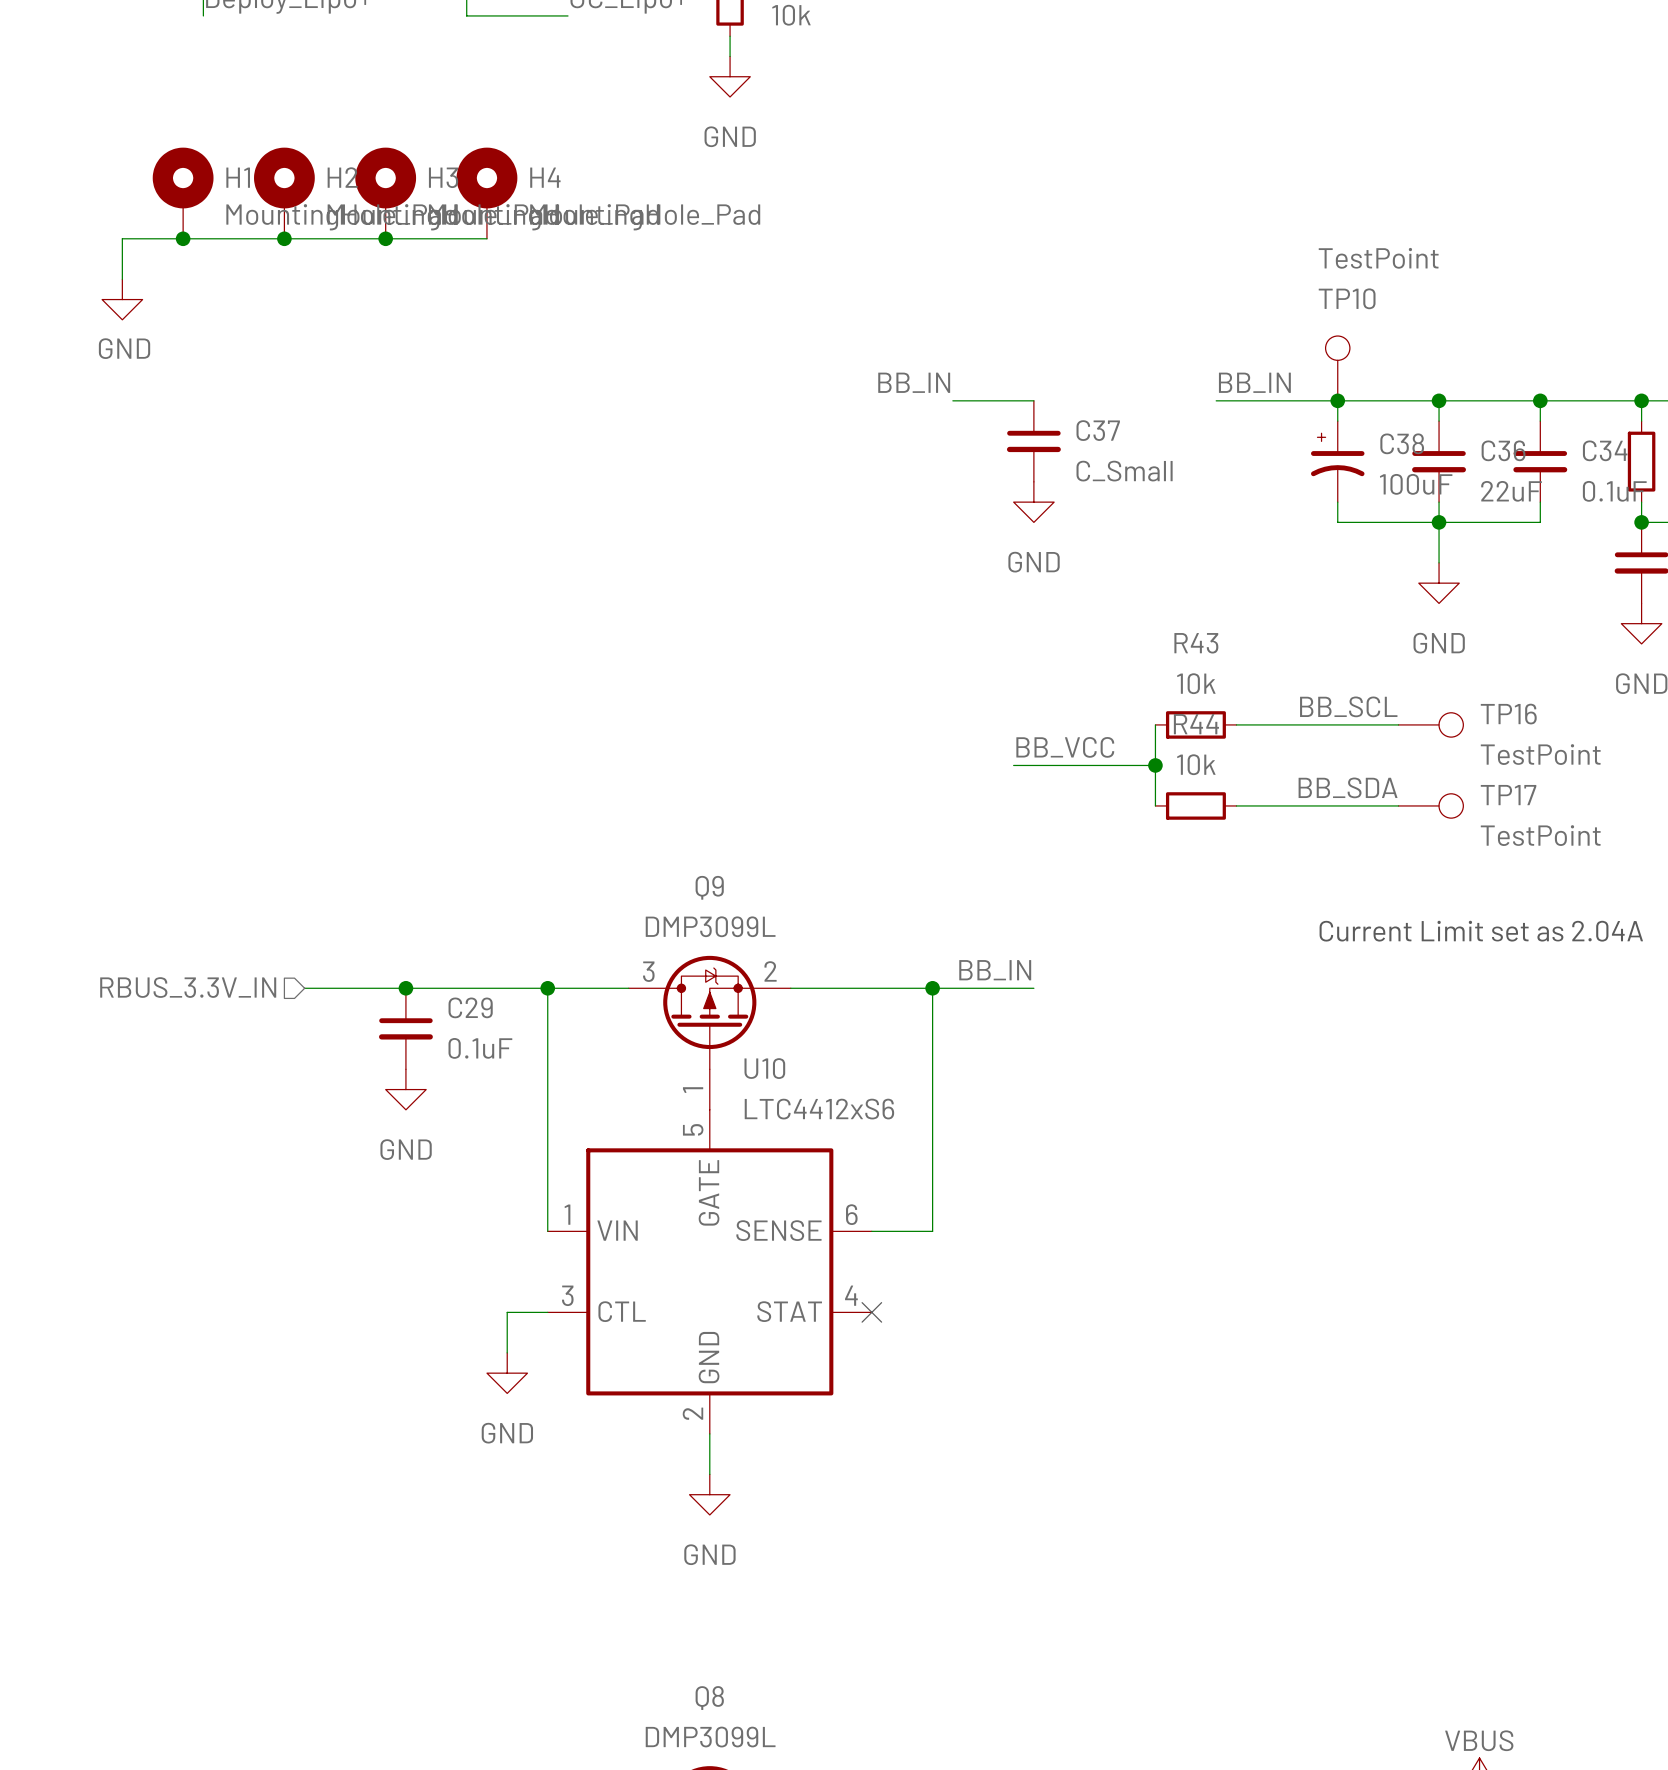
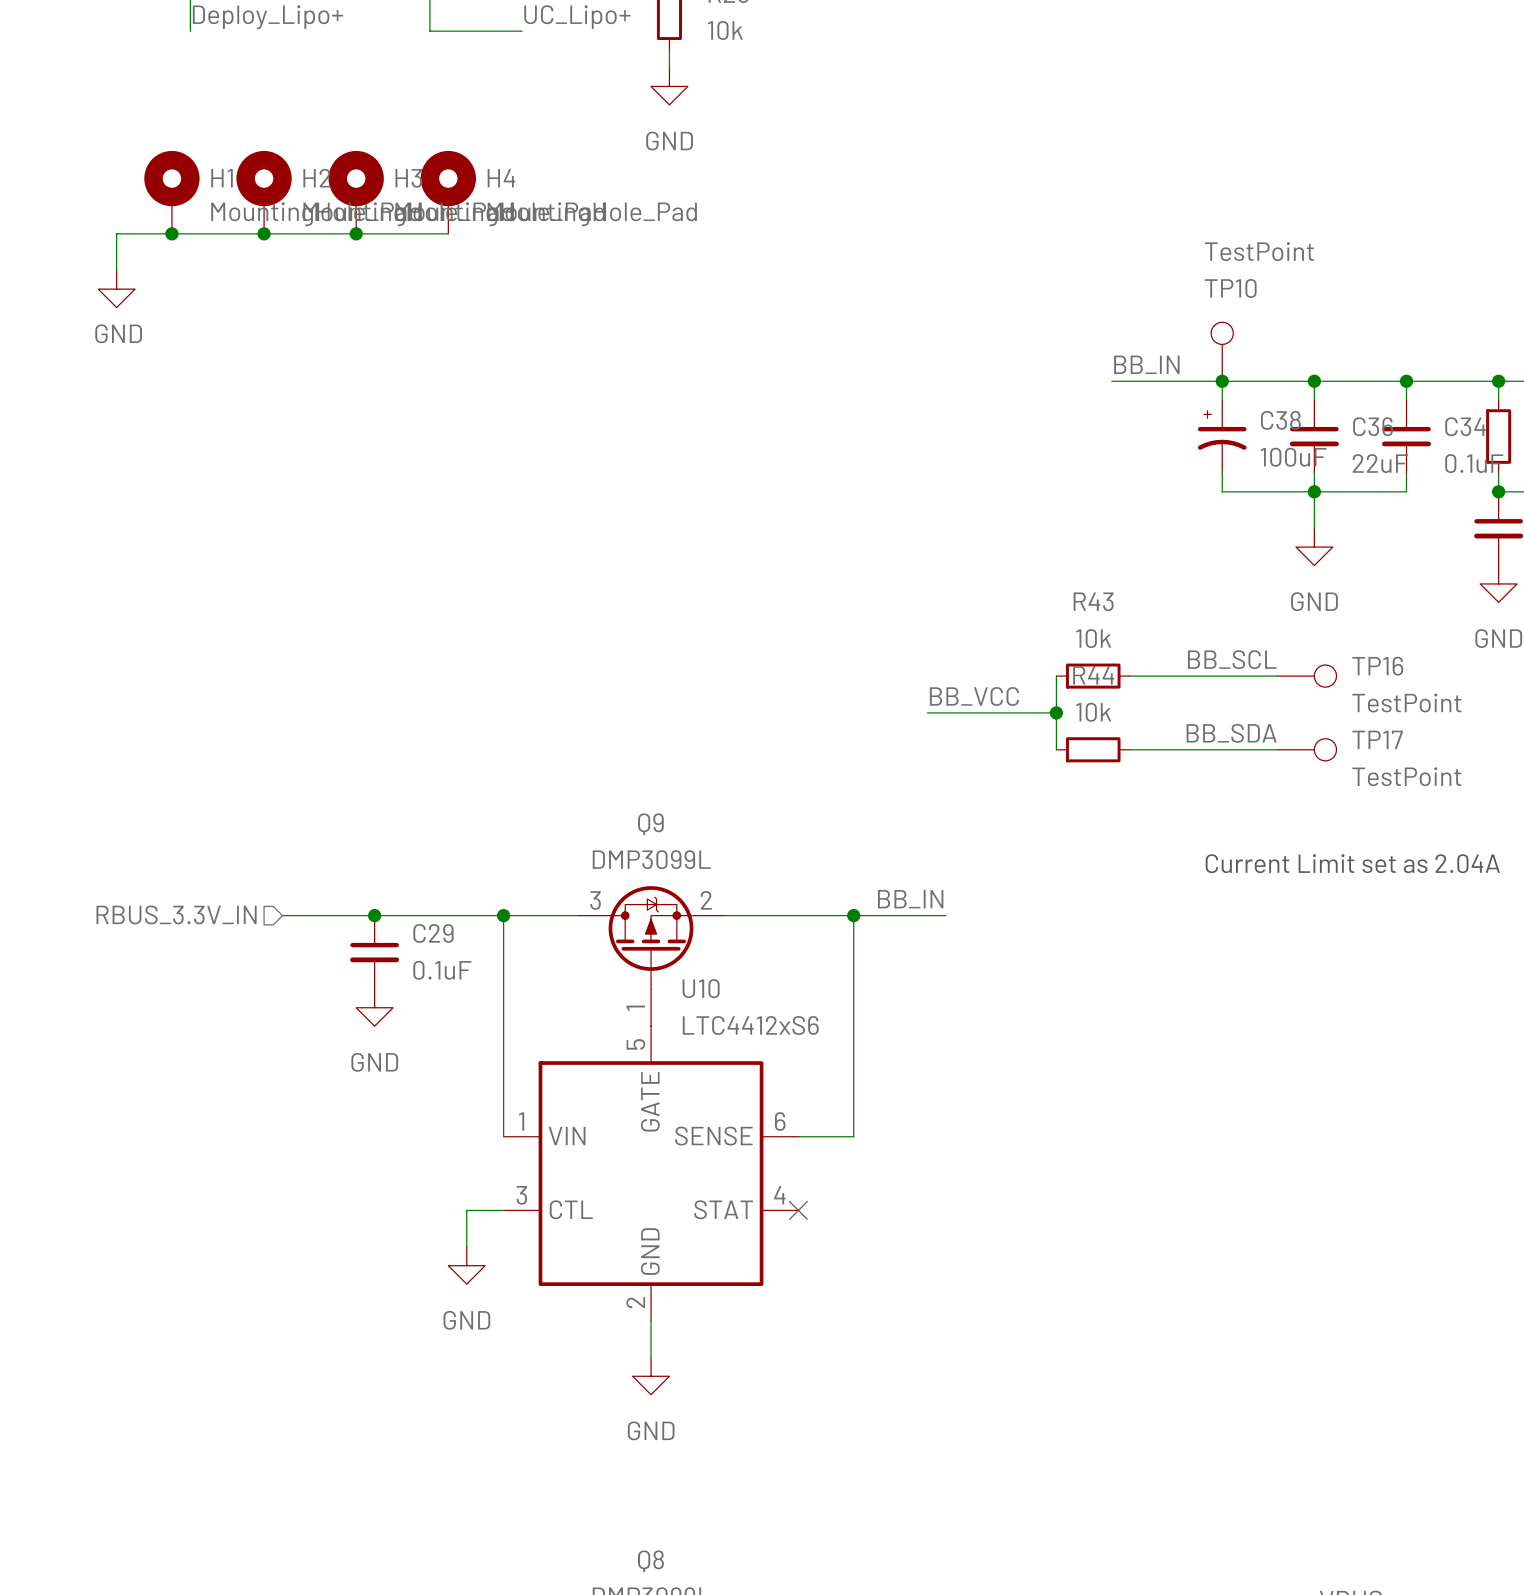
label: BB_IN (914, 382) -> none
wire: (952, 400) (1033, 400) -> none
C37: C_Small (1033, 441) -> none
power symbol: GND (1033, 502) -> none

